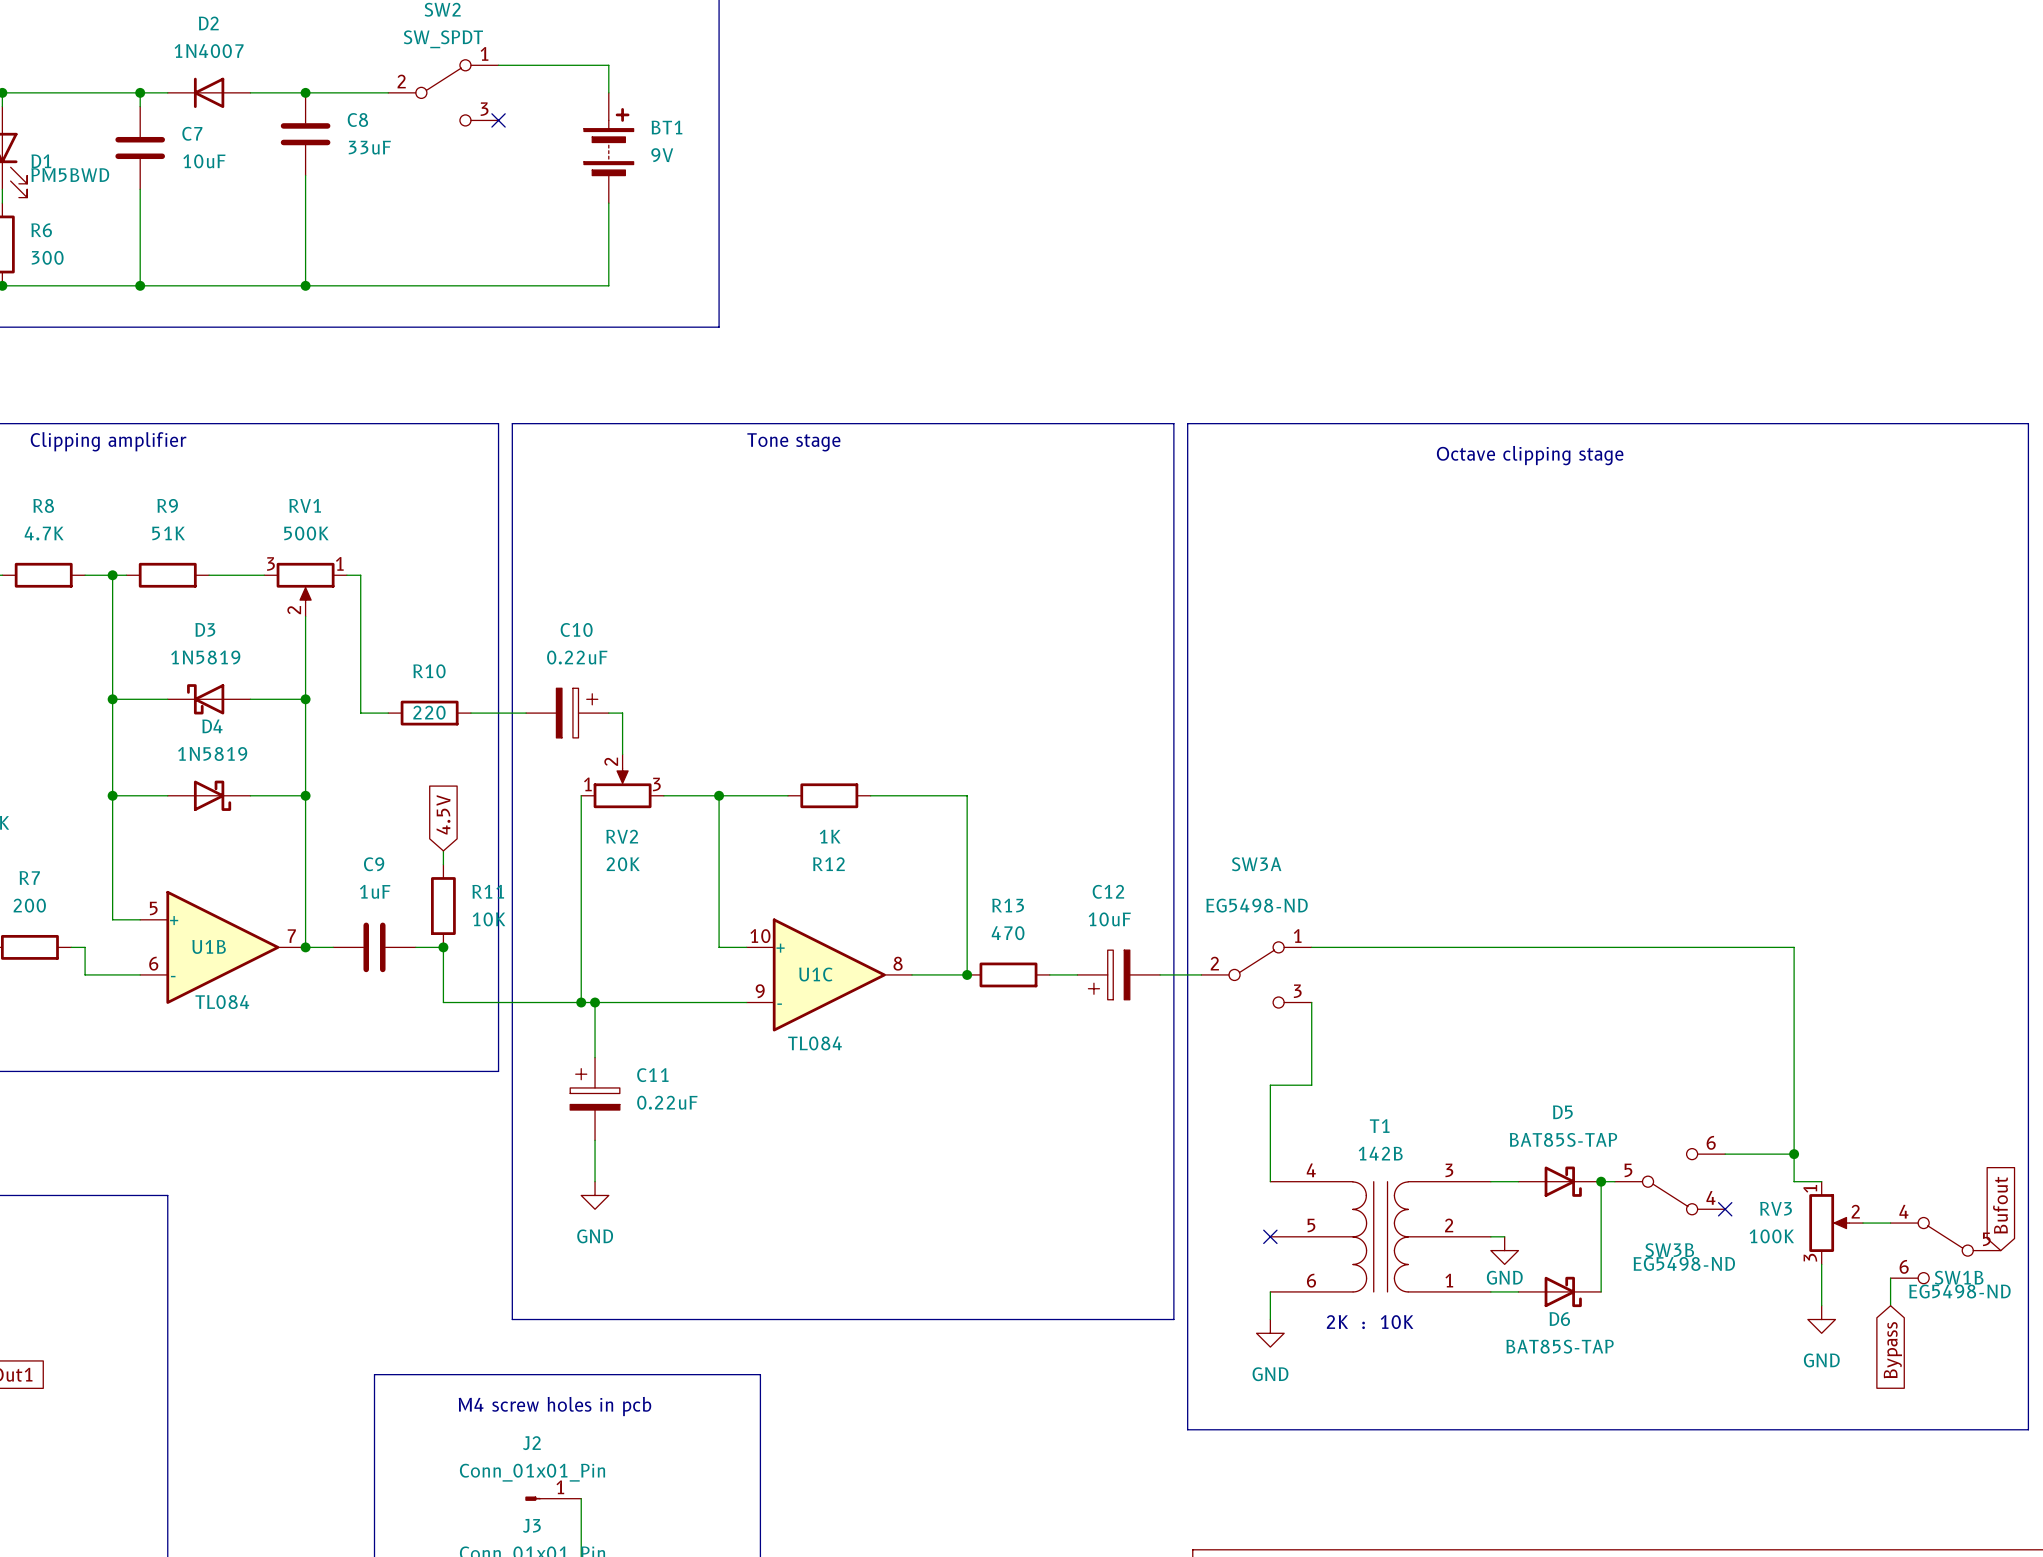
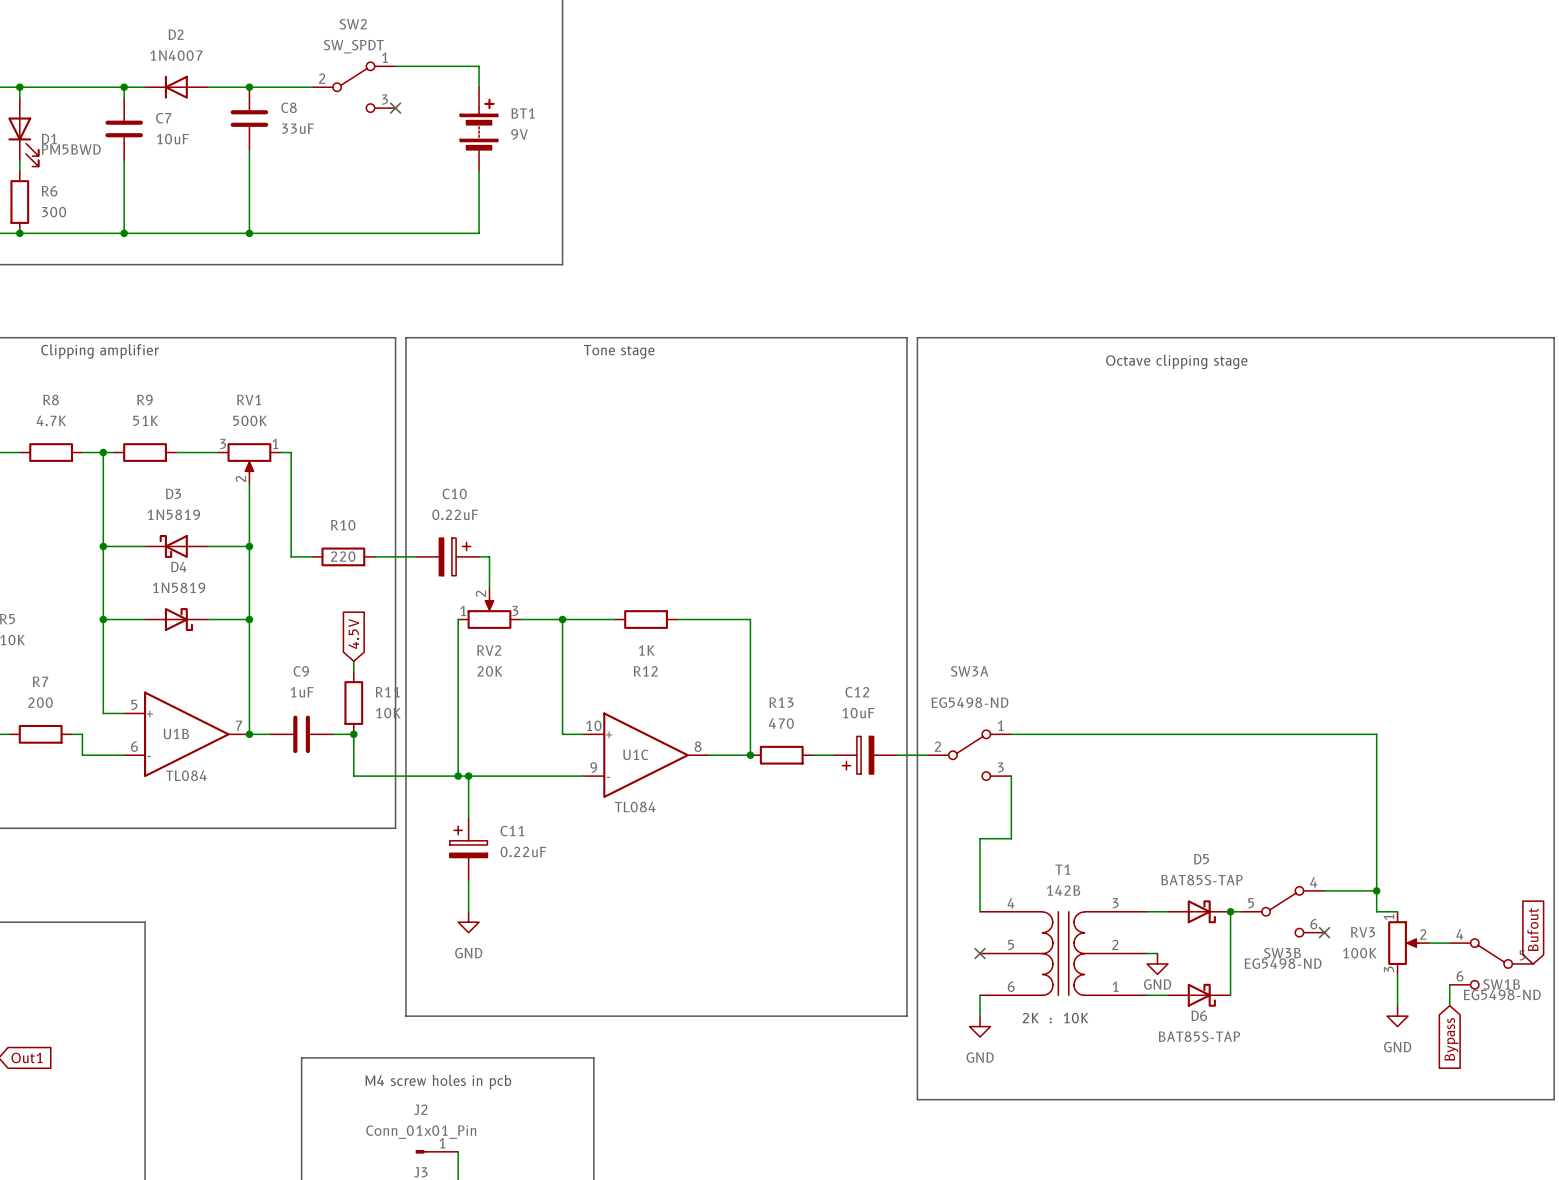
SW3B flip: as is (1670, 1181) -> up-down (1282, 911)

